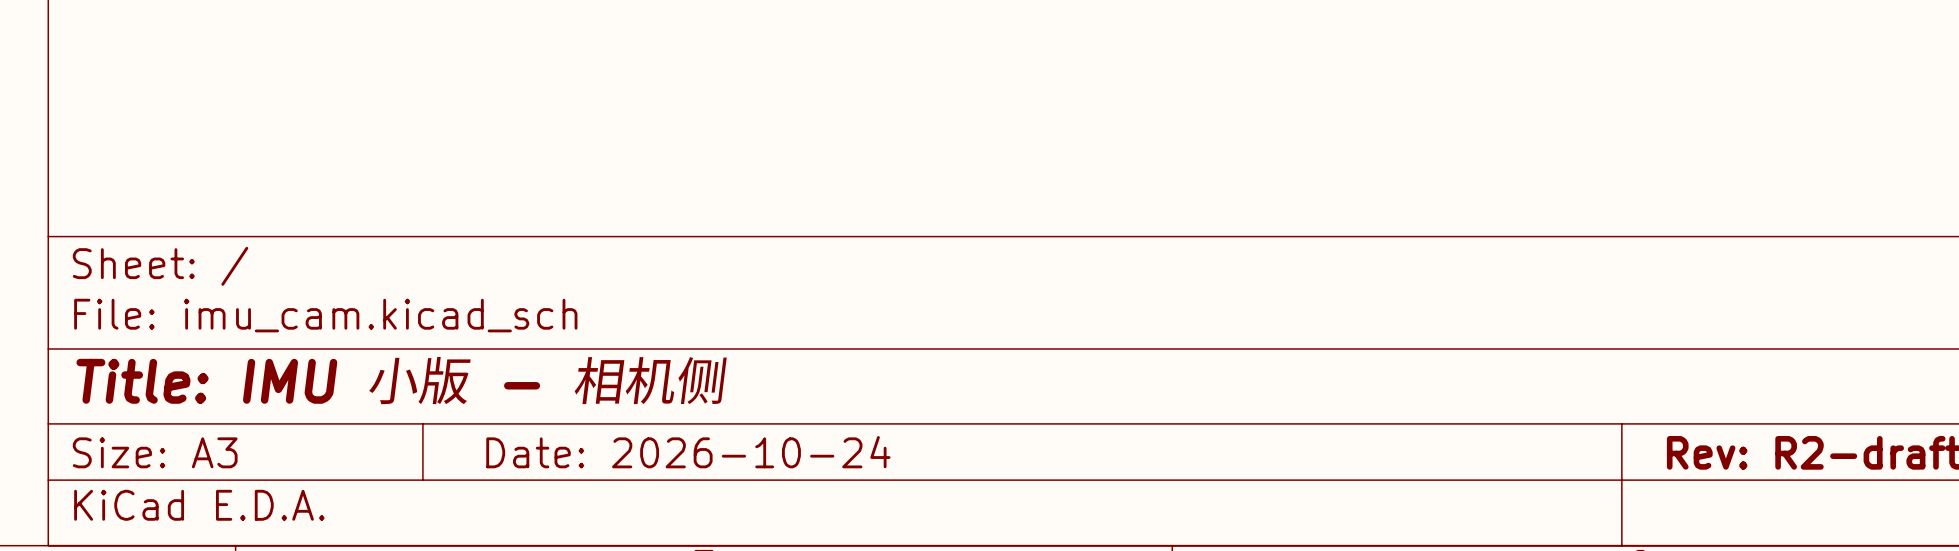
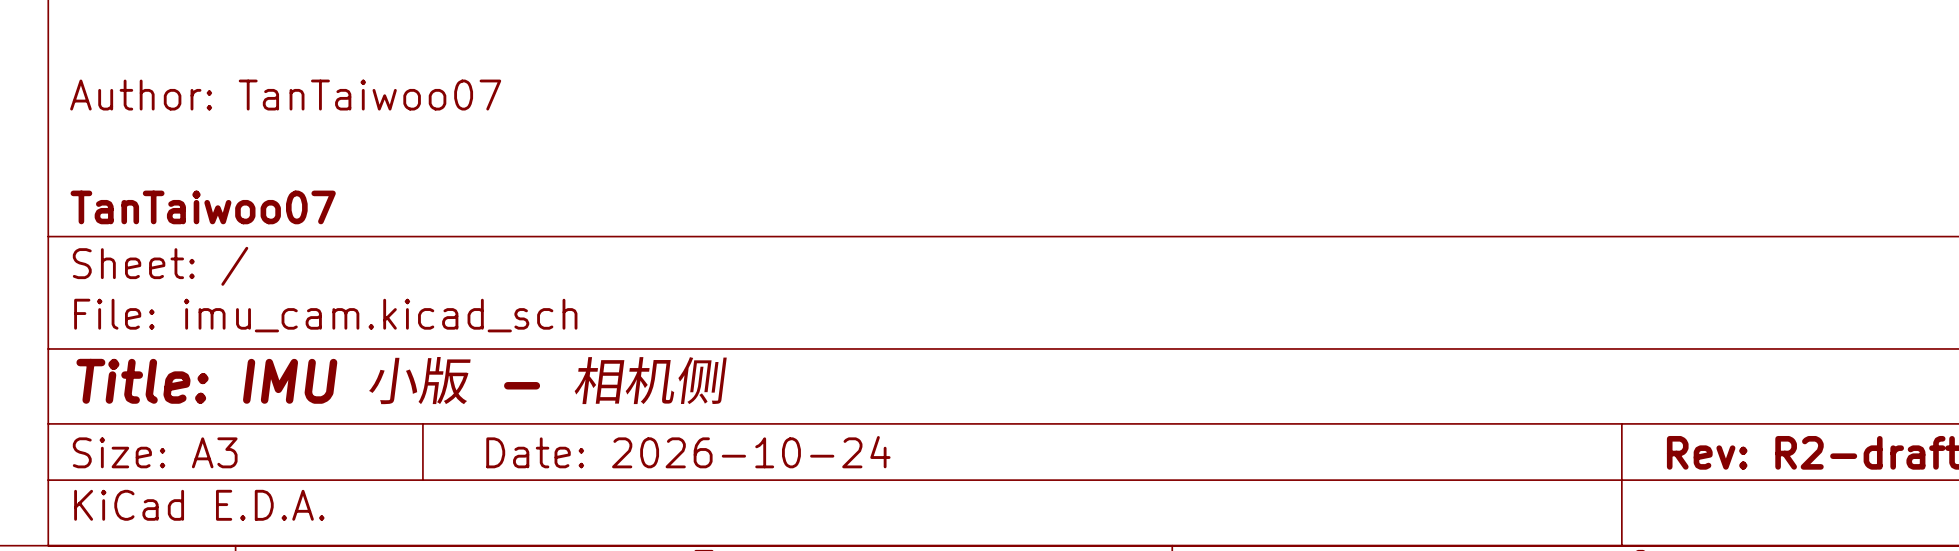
title block: none -> Author: TanTaiwoo07 (285, 95)
title block: none -> TanTaiwoo07 (203, 207)

